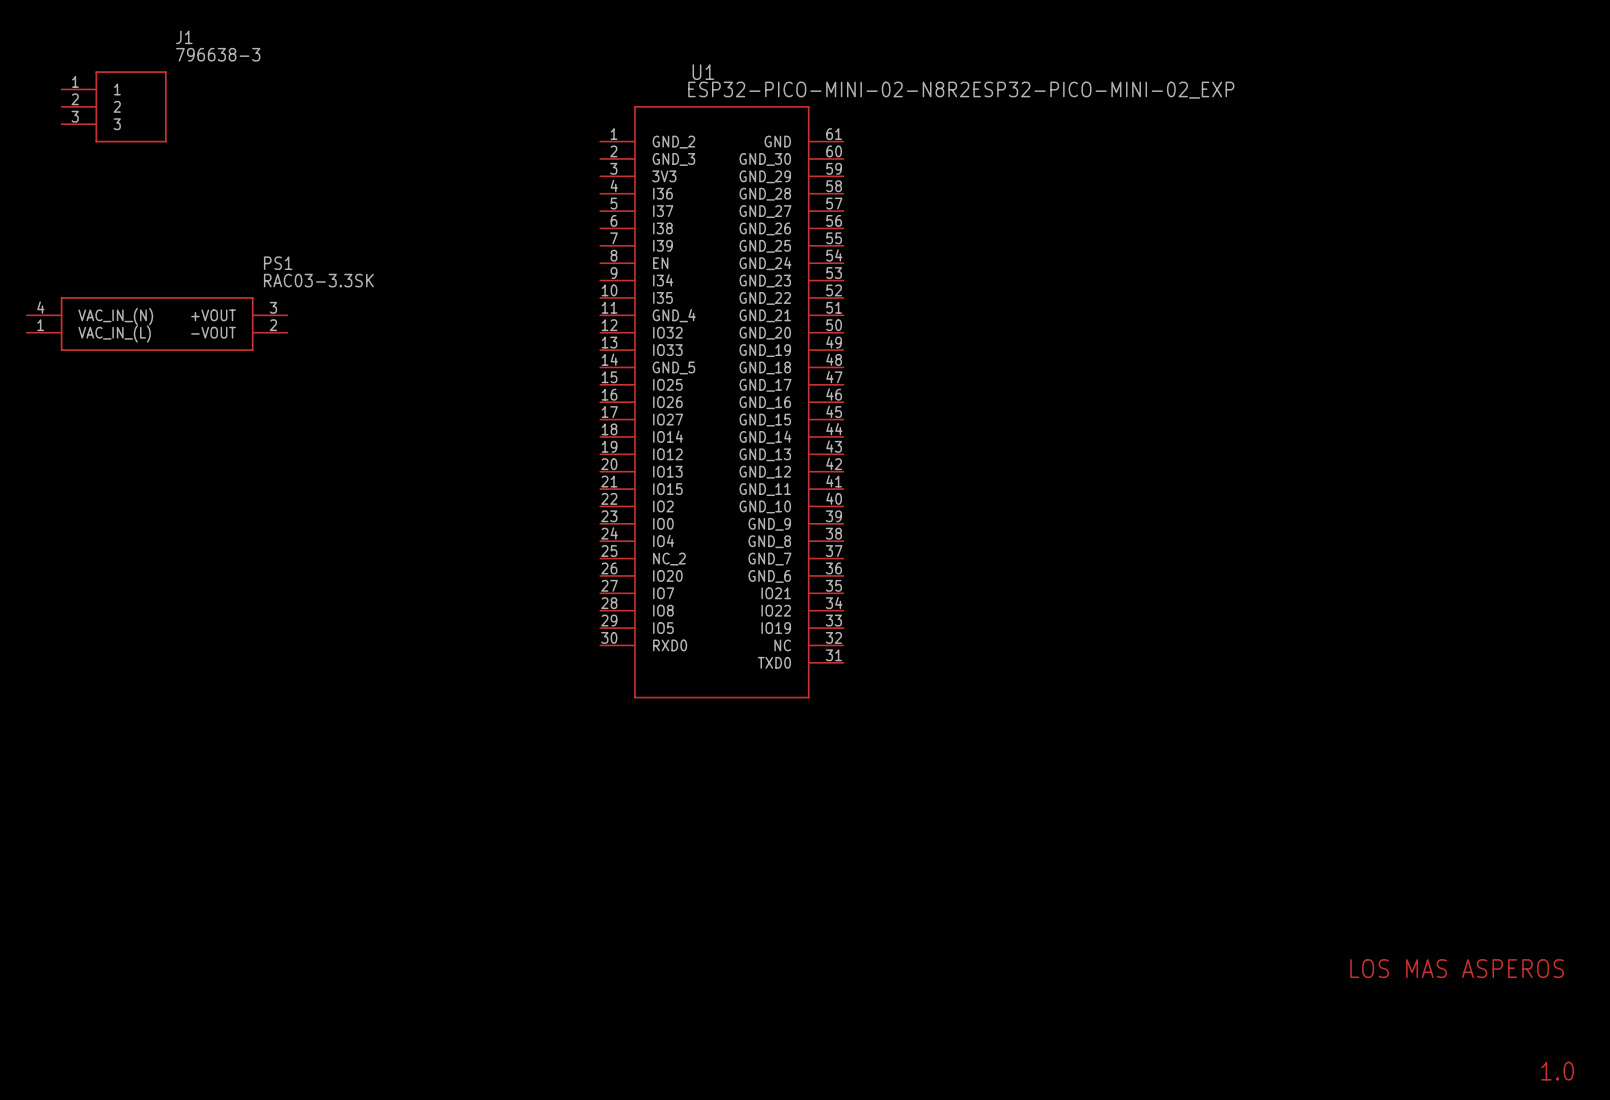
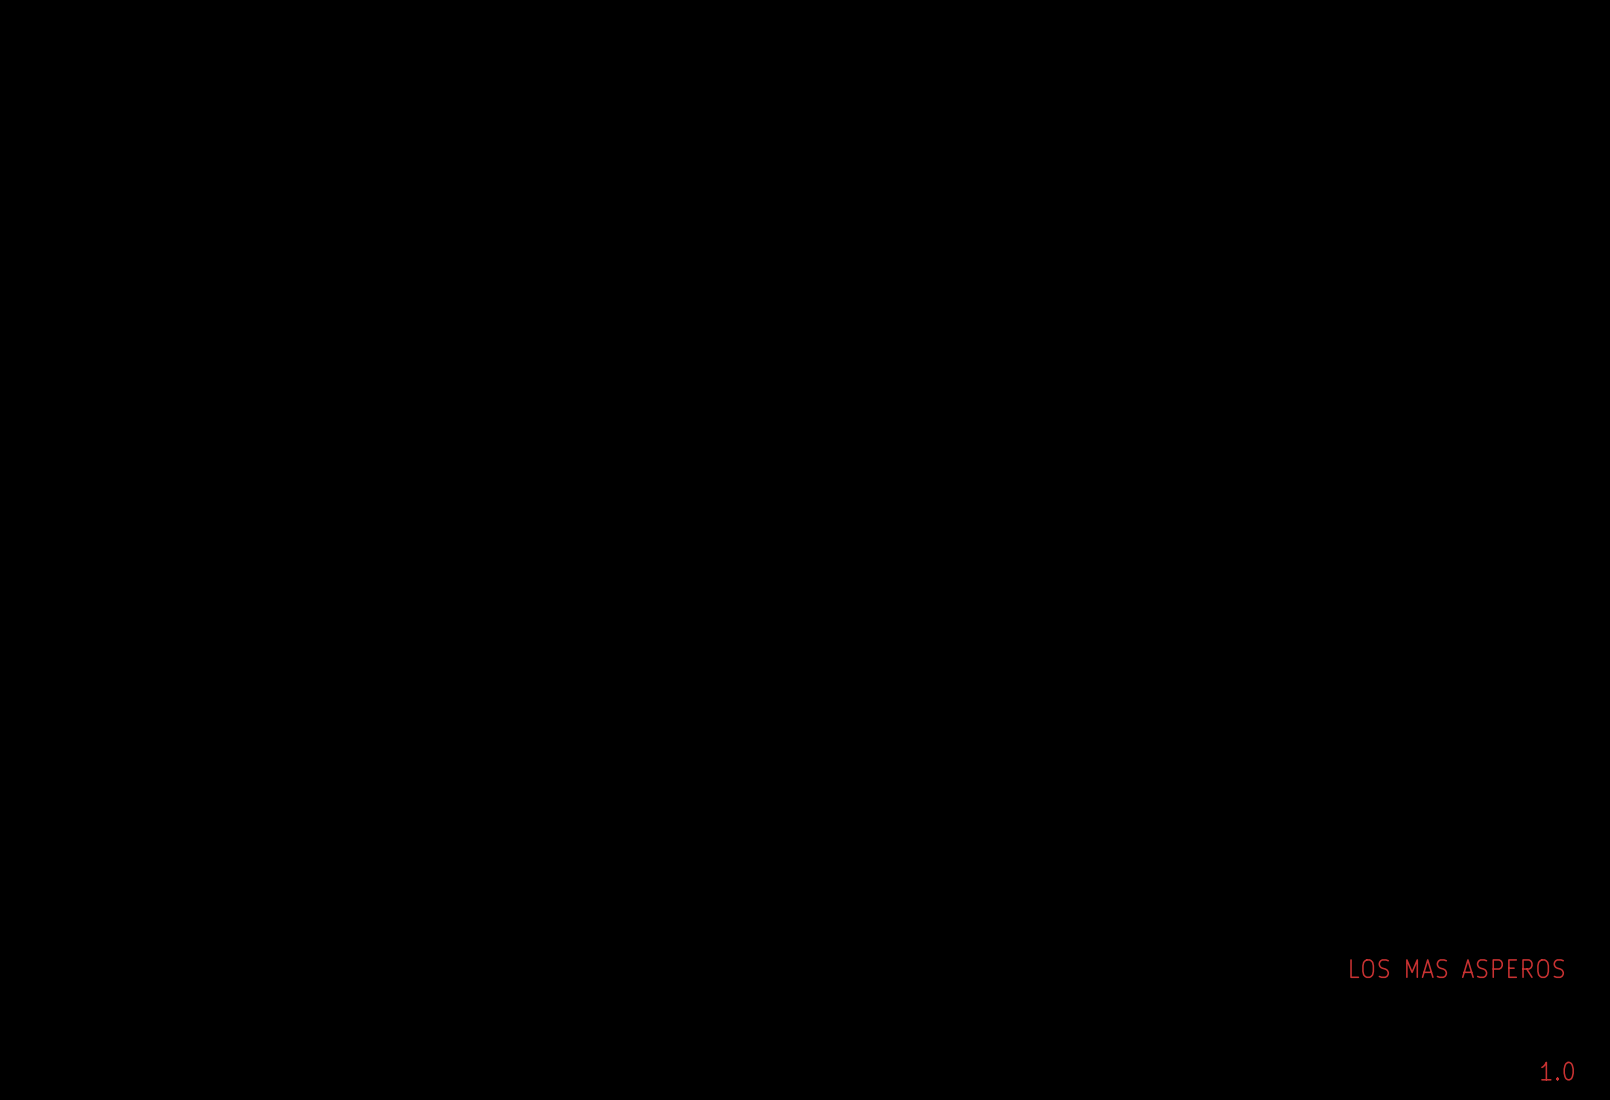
J1: 796638-3 (114, 106) -> none
PS1: RAC03-3.3SK (157, 324) -> none
U1: ESP32-PICO-MINI-02-N8R2ESP32-PICO-MINI-02_EXP (721, 402) -> none

